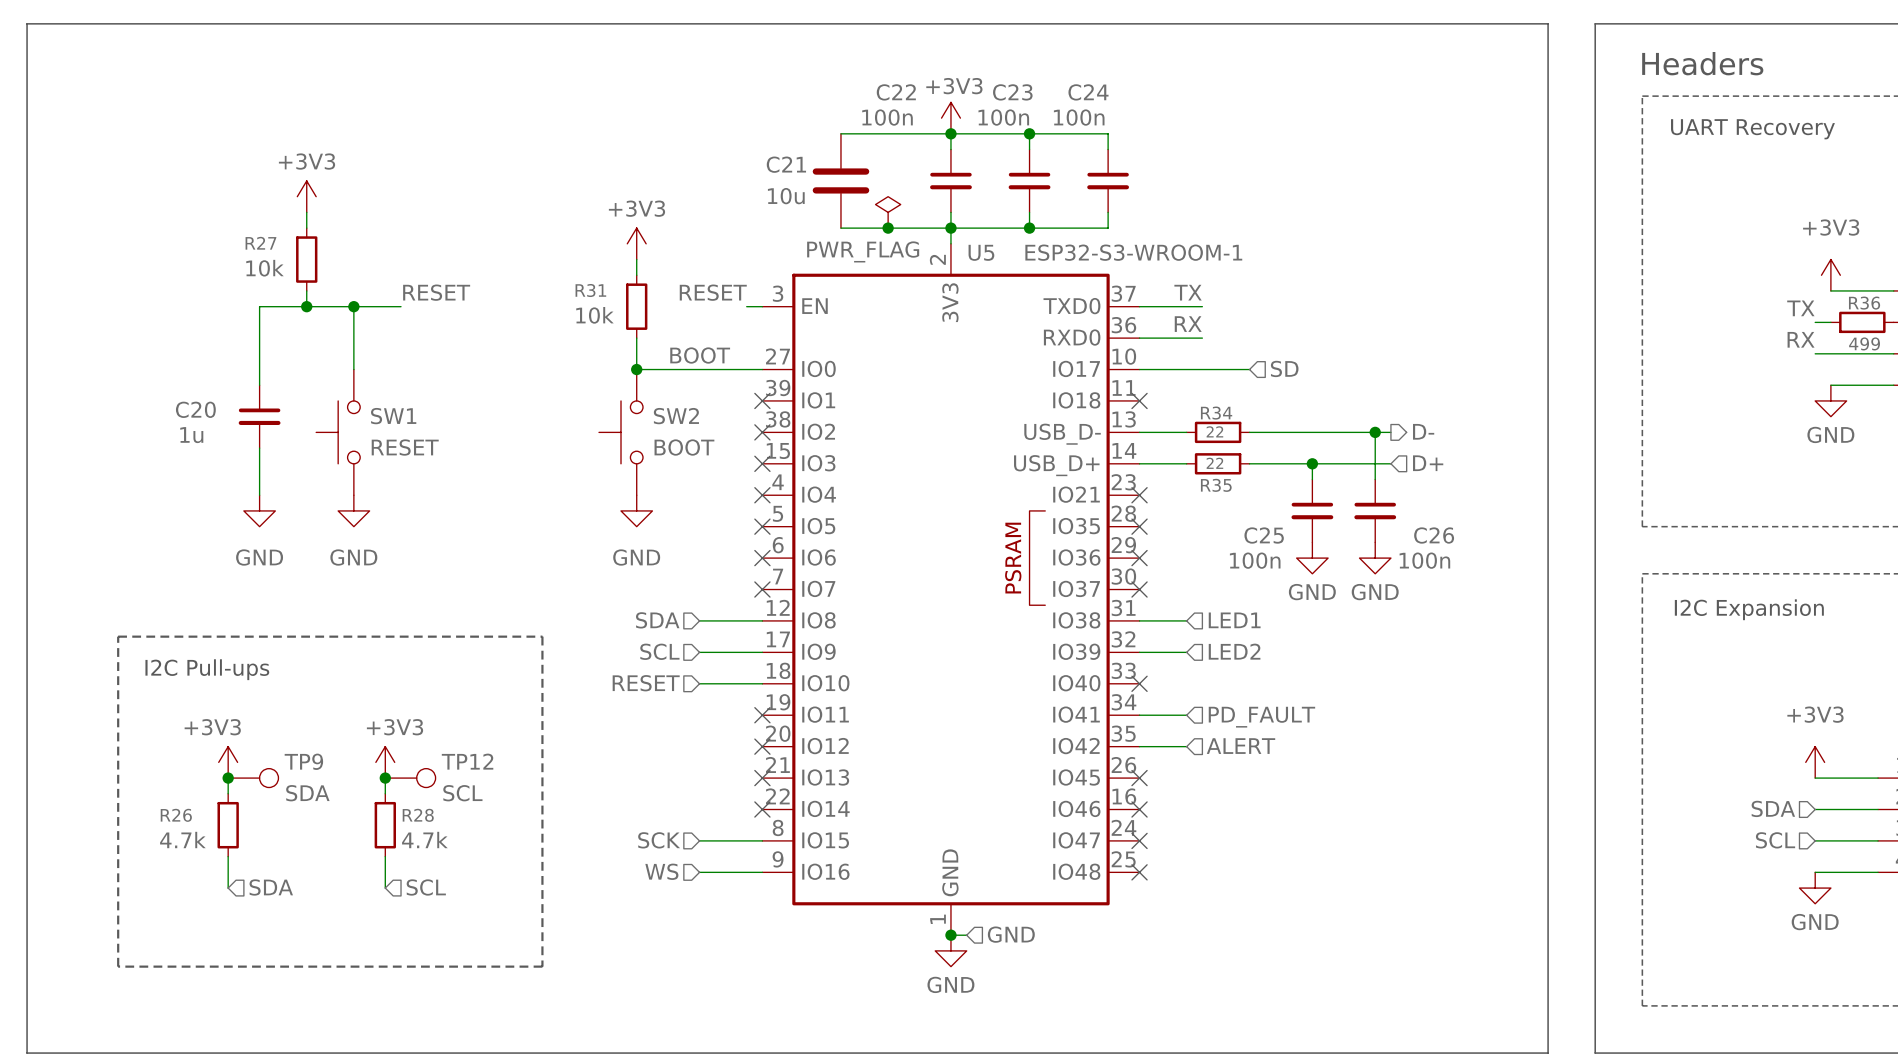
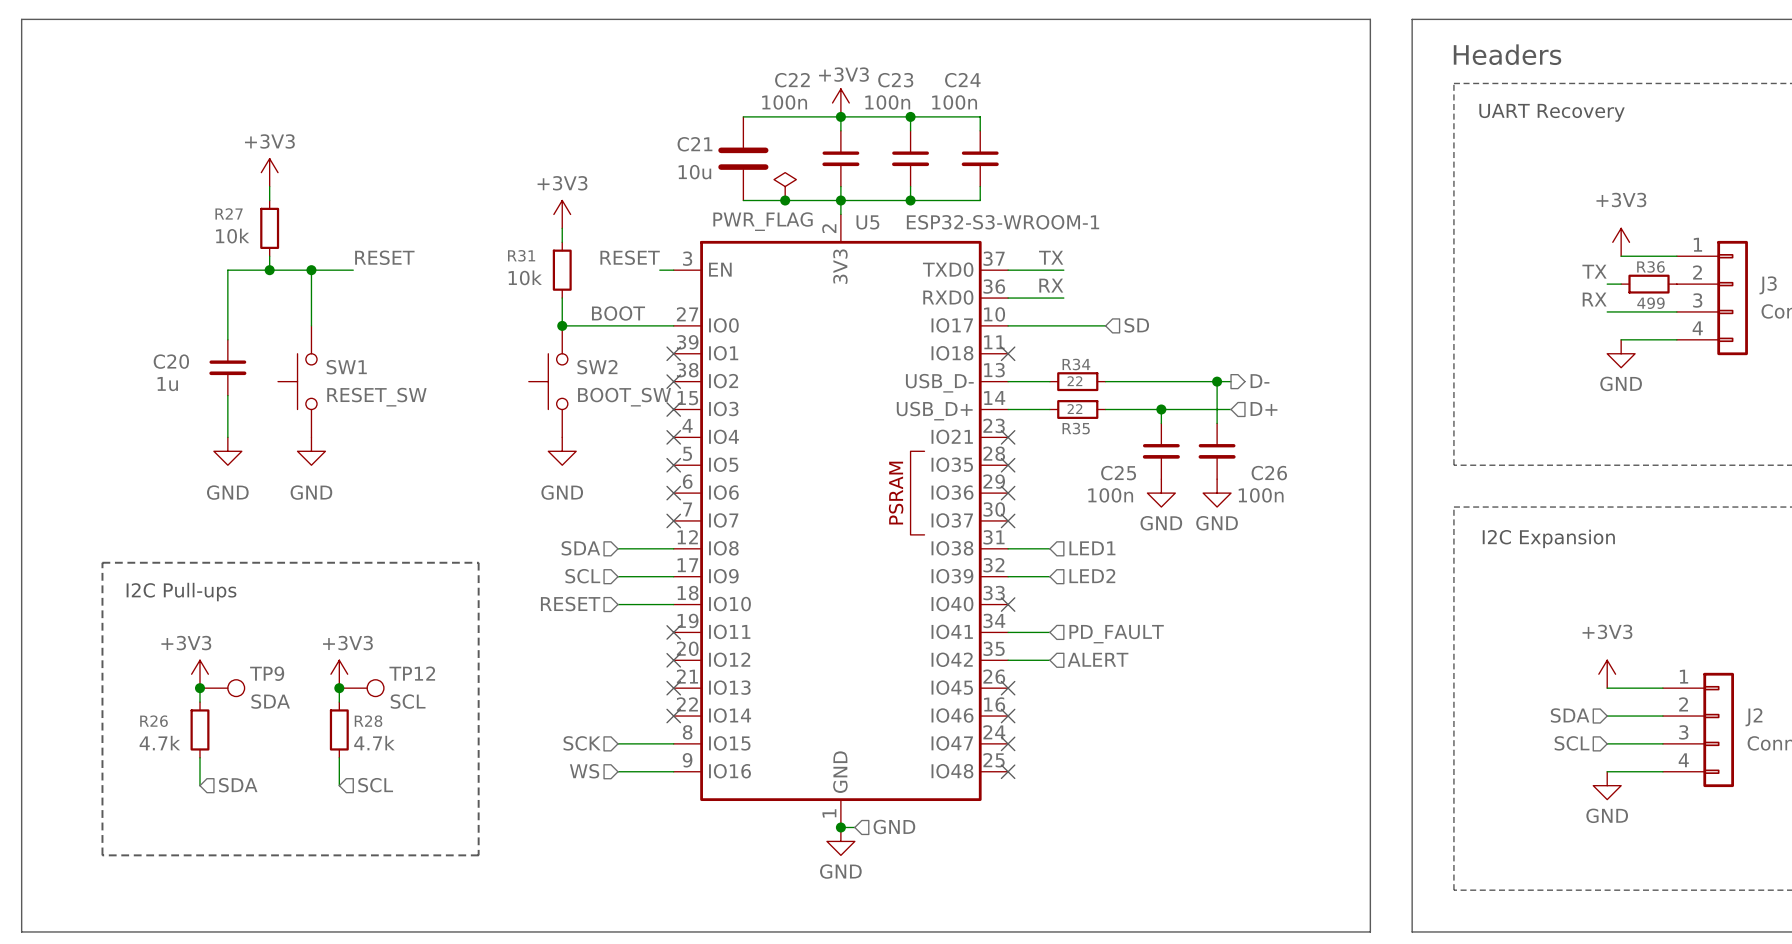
SW1 value: RESET (405, 447) -> RESET_SW (376, 397)
SW2 value: BOOT (684, 447) -> BOOT_SW (624, 397)

